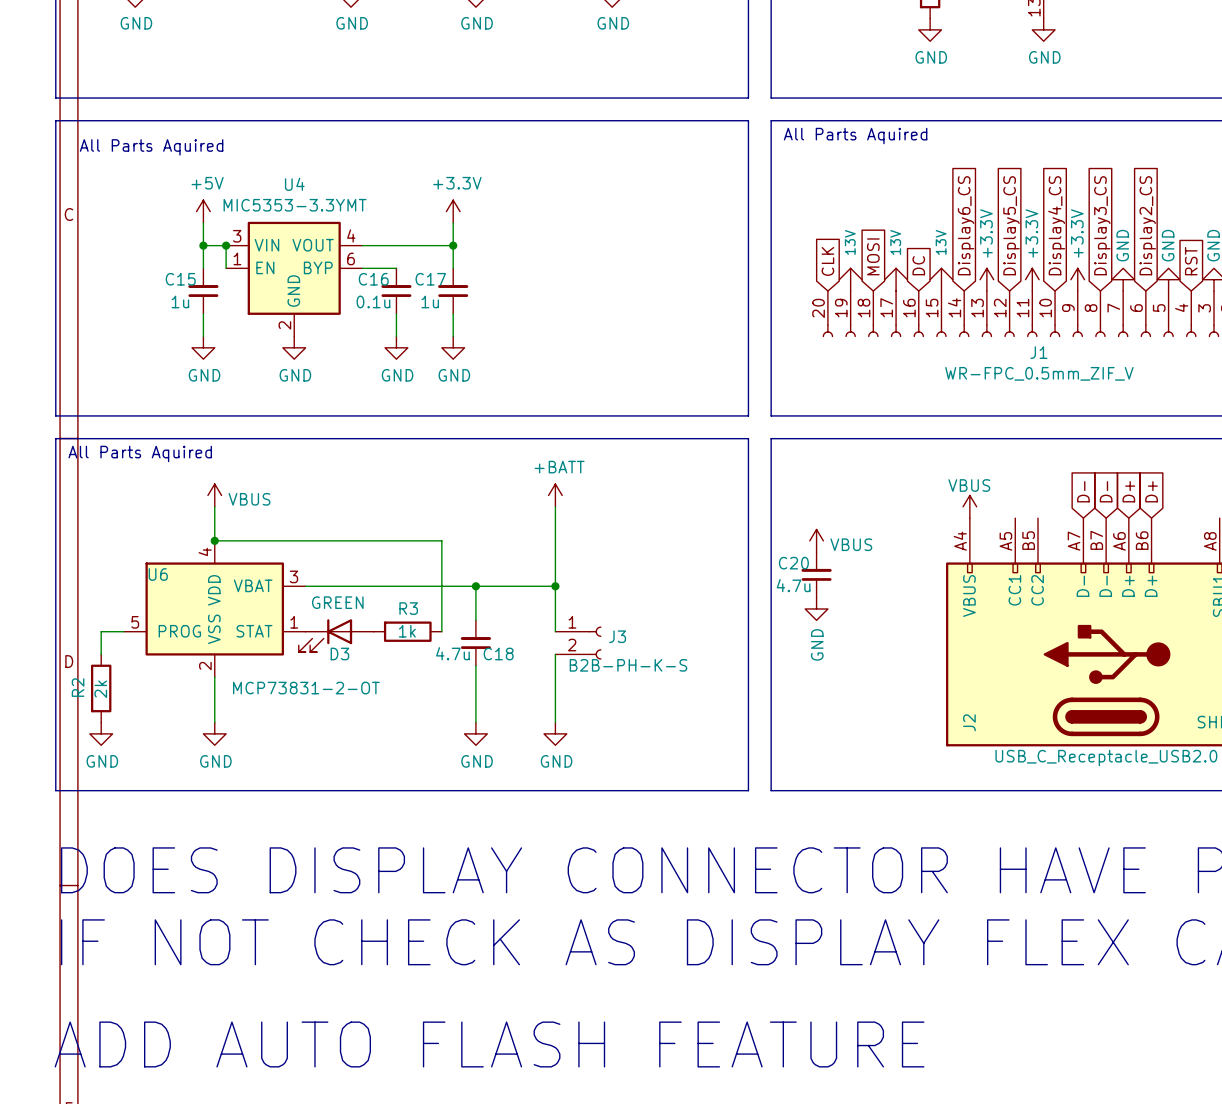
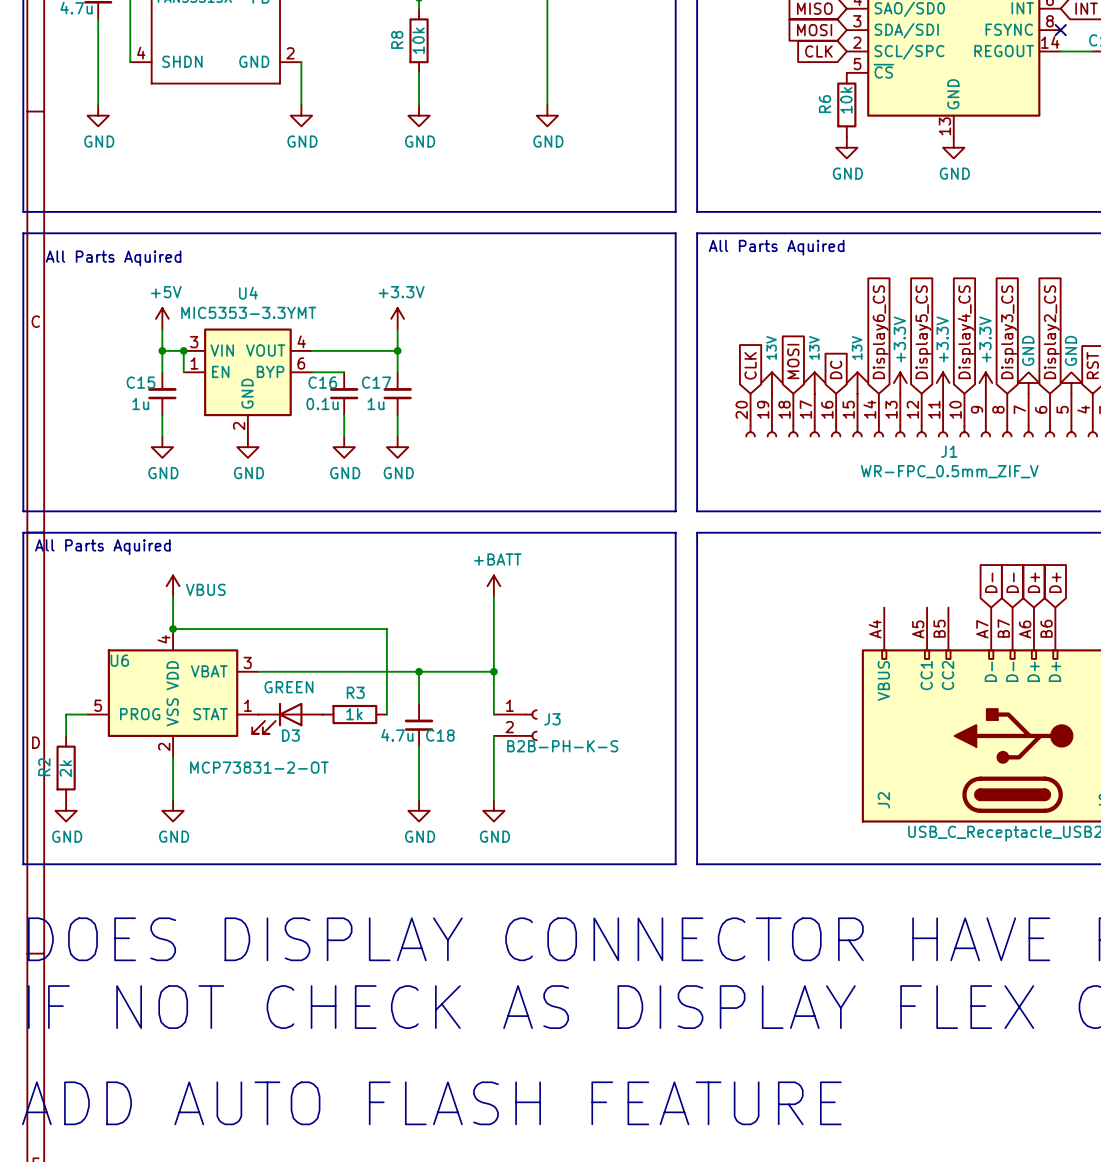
power symbol: VBUS (969, 506) -> none
power symbol: VBUS (816, 540) -> none
C20: 4.7u (816, 574) -> none
power symbol: GND (816, 608) -> none

